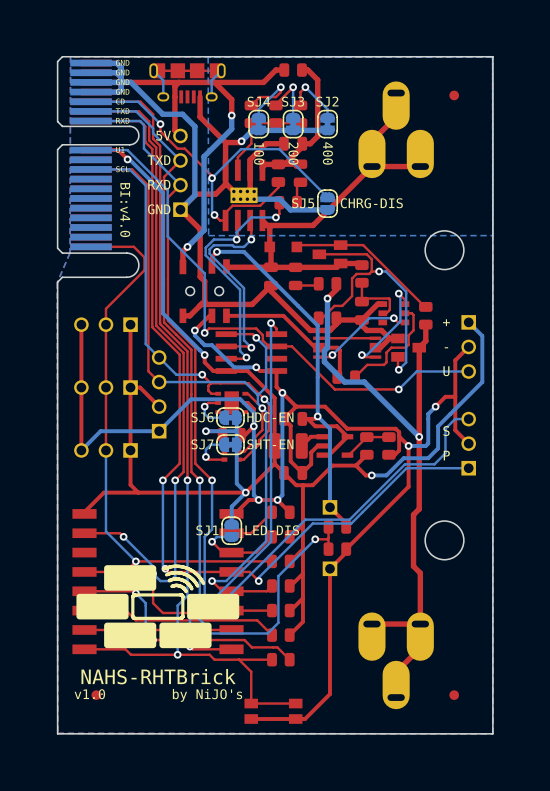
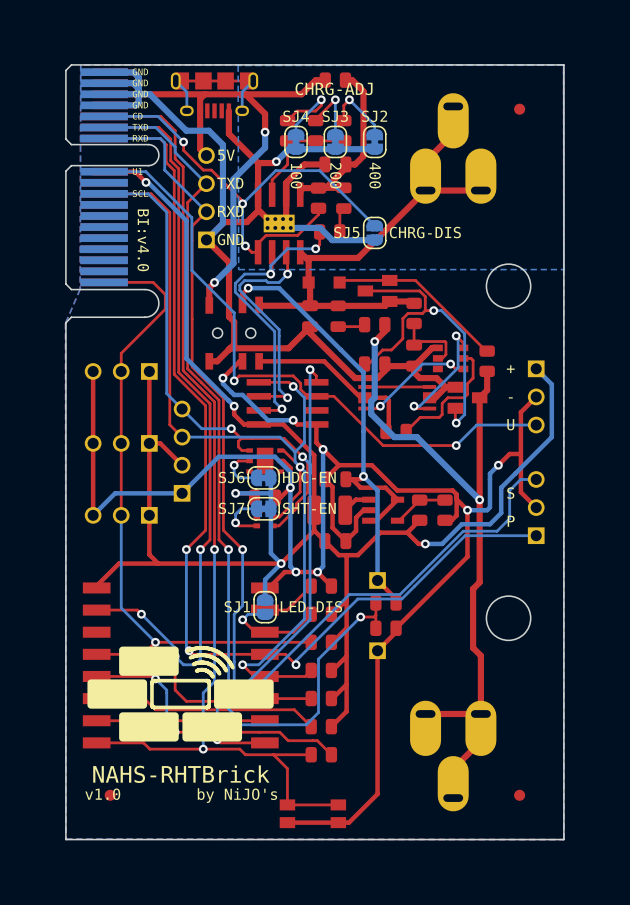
text: none -> CHRG-ADJ (334, 88)
text position: 5V (163, 135) -> 5V (226, 155)
text position: TXD (159, 160) -> TXD (230, 183)
text position: RXD (159, 184) -> RXD (230, 211)
text position: GND (159, 209) -> GND (230, 239)

